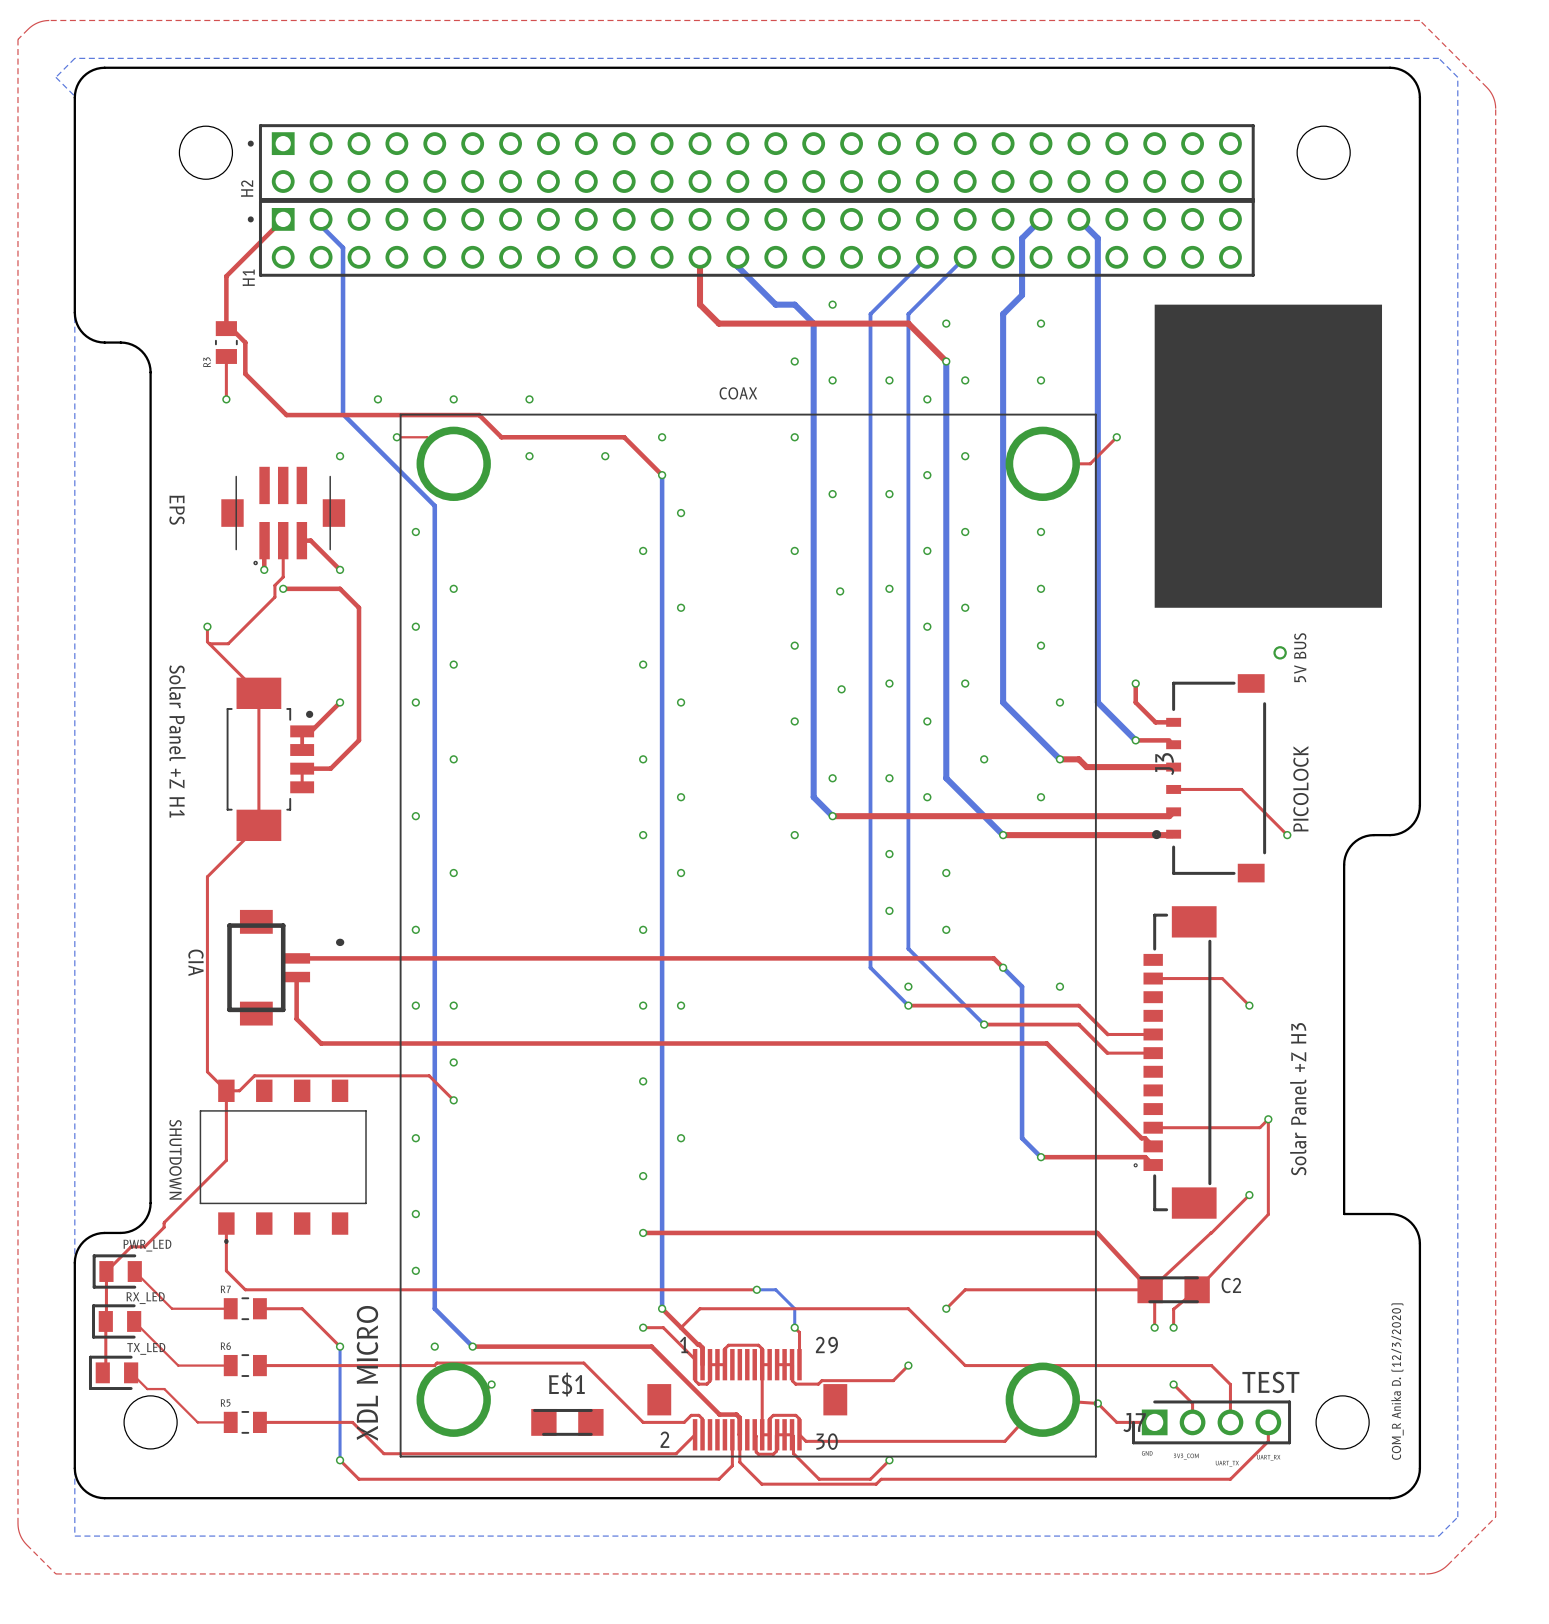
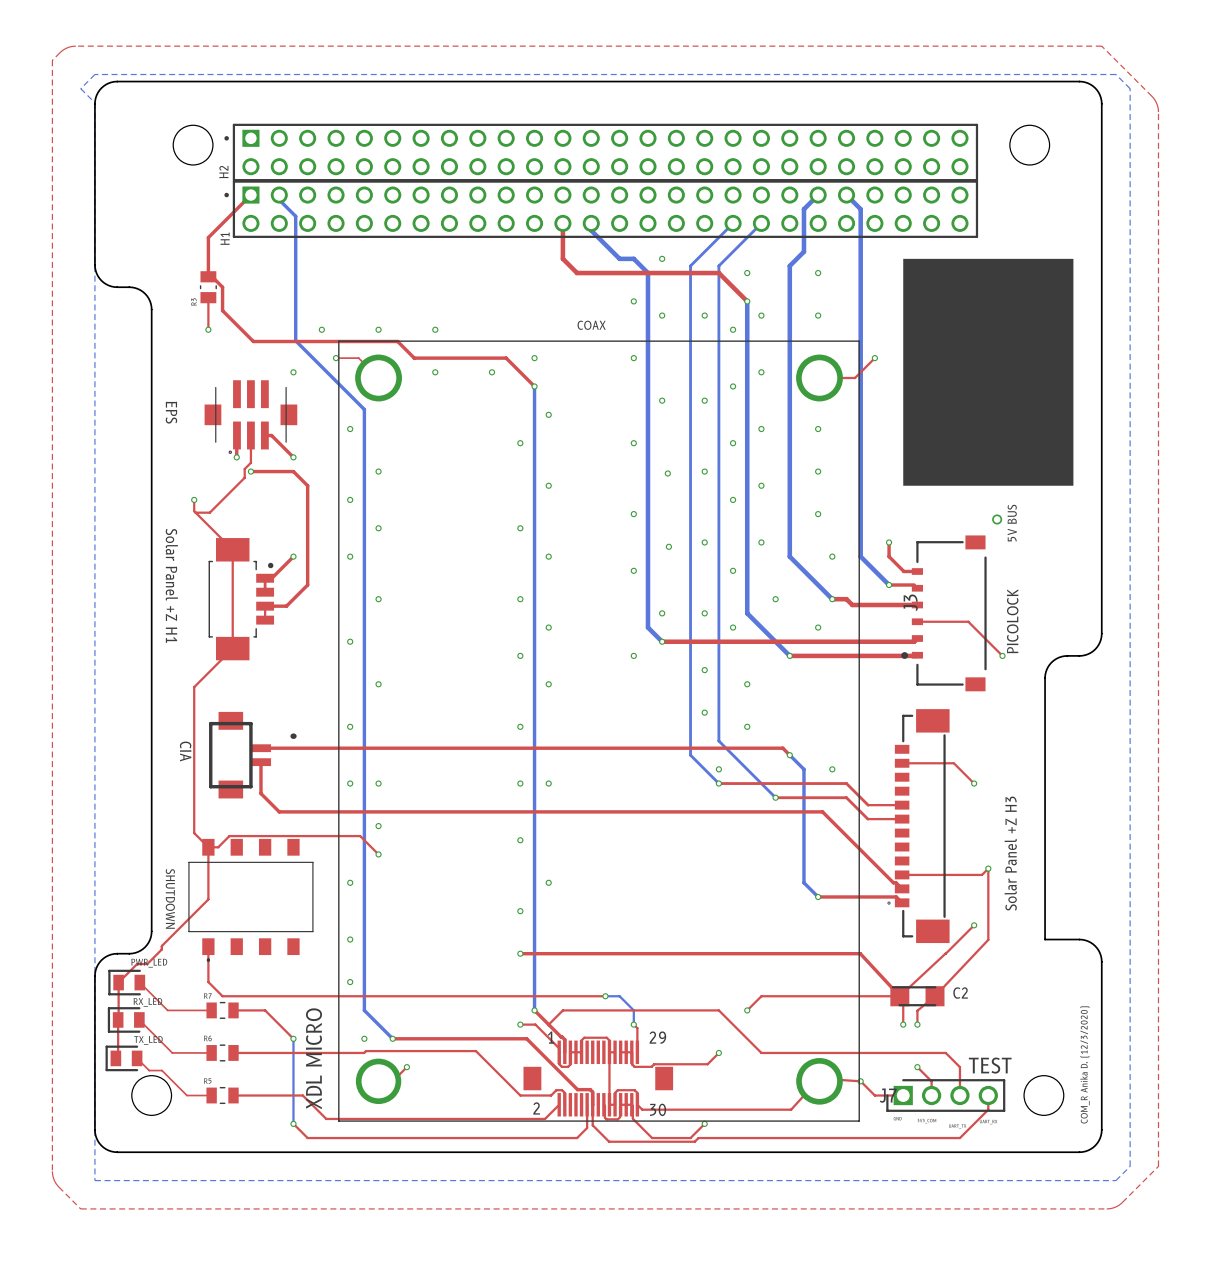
part footprint: [399, 413, 1097, 1458] -> [338, 340, 860, 1122]
E$1: (567, 1422) -> none

